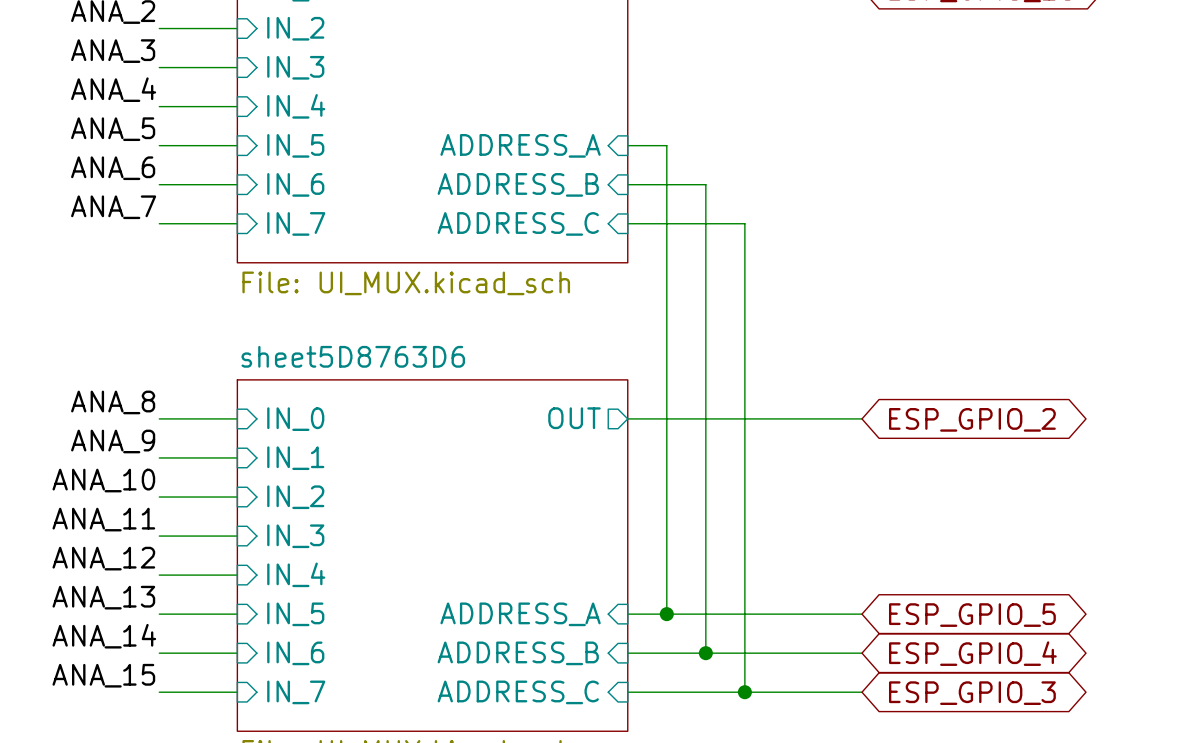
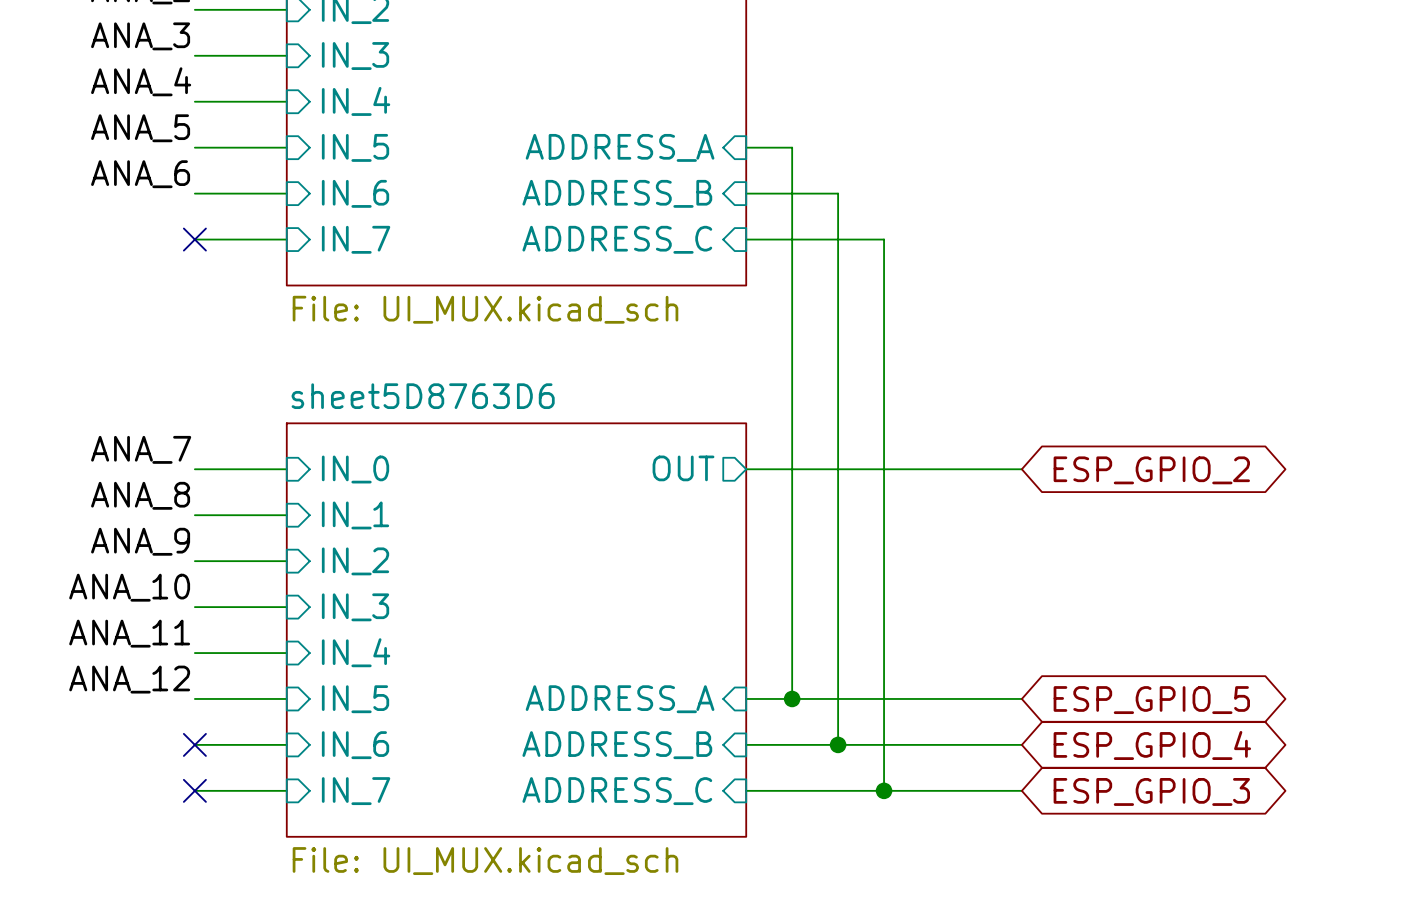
label: ANA_7 (113, 207) -> none
no-connect mark: none -> (194, 239)
label: ANA_8 (113, 402) -> ANA_7 (141, 449)
label: ANA_9 (113, 441) -> ANA_8 (140, 495)
label: ANA_10 (103, 480) -> ANA_9 (140, 541)
label: ANA_11 (103, 519) -> ANA_10 (129, 587)
label: ANA_12 (103, 558) -> ANA_11 (129, 633)
label: ANA_13 (103, 597) -> ANA_12 (129, 679)
label: ANA_14 (104, 636) -> none
no-connect mark: none -> (194, 744)
label: ANA_15 (103, 675) -> none
no-connect mark: none -> (194, 790)

